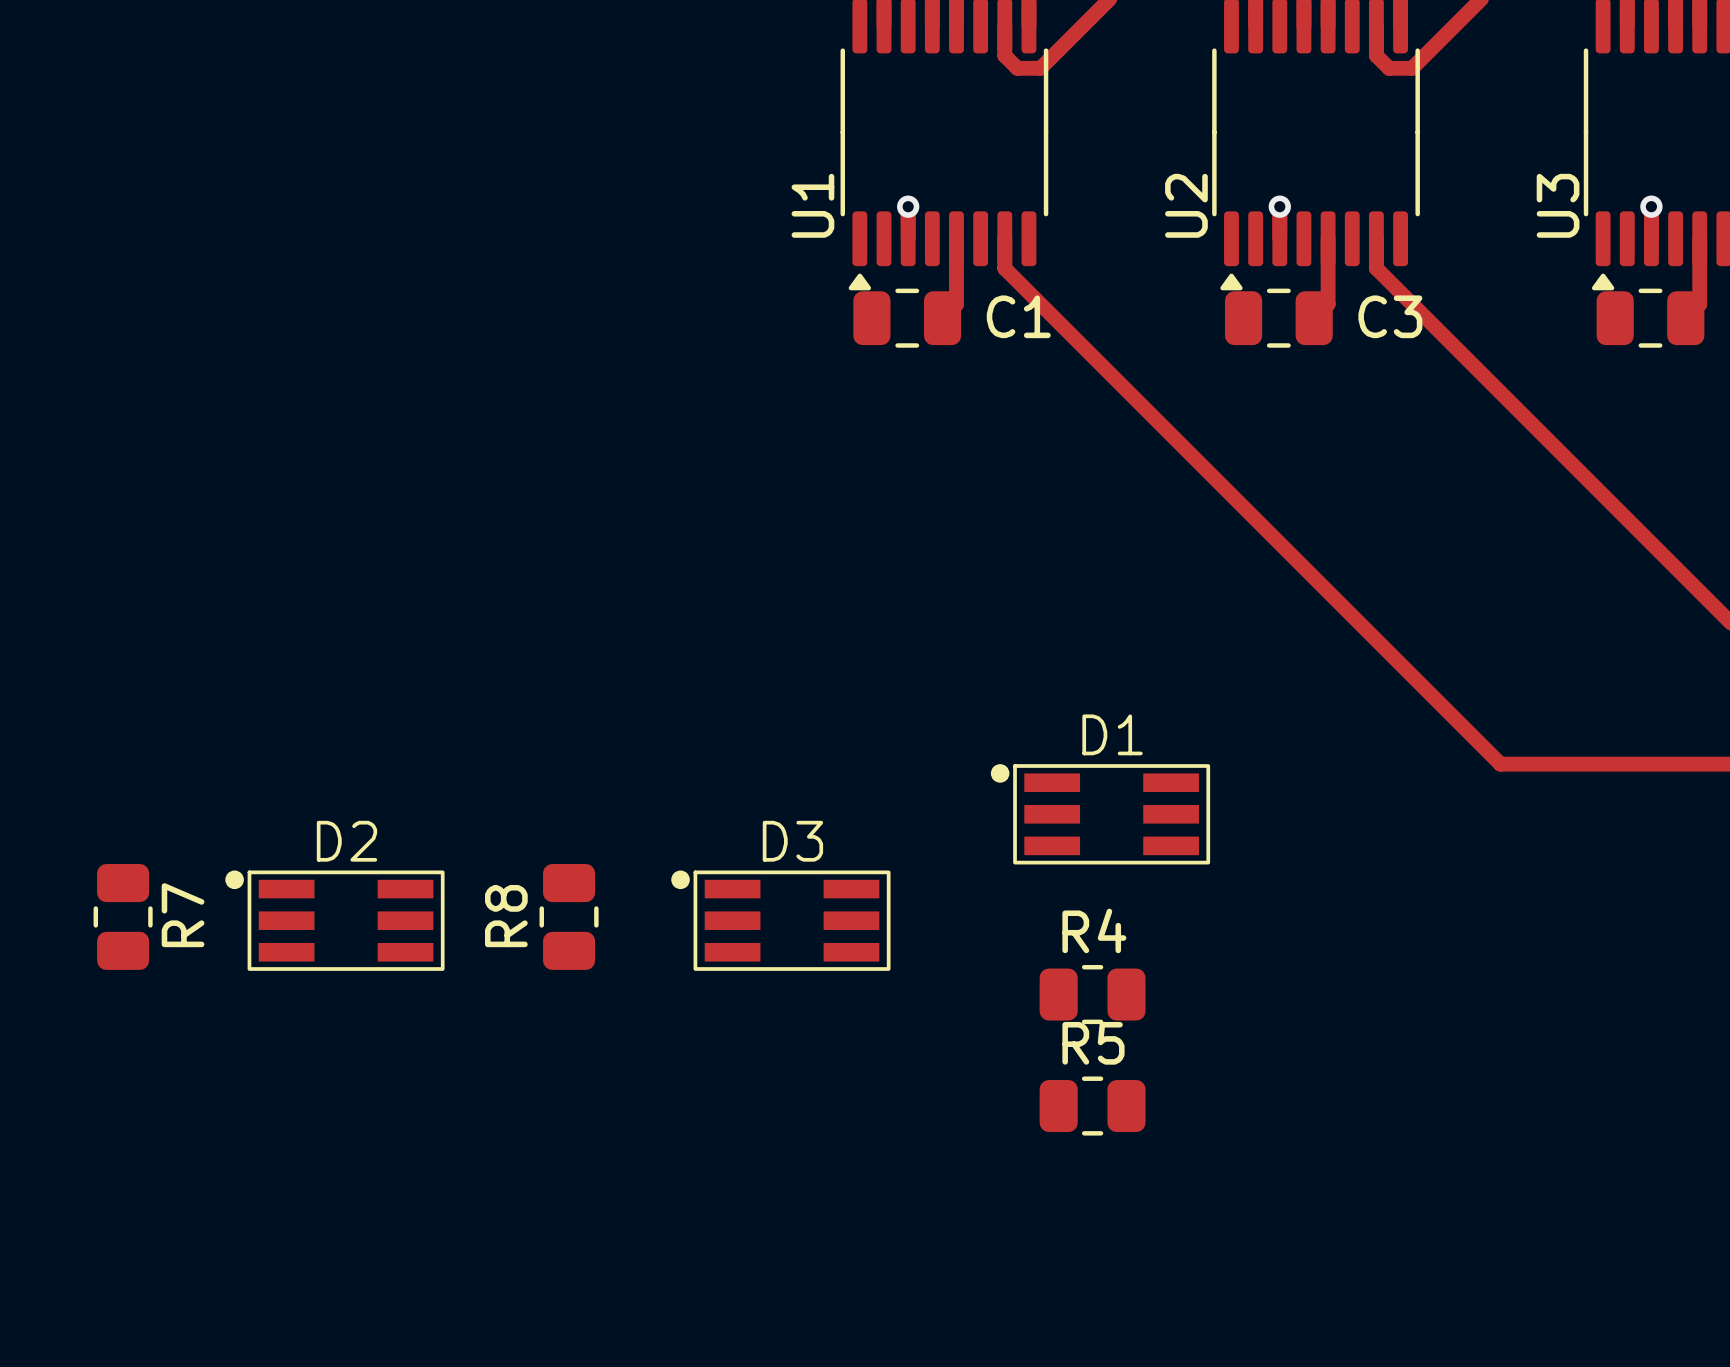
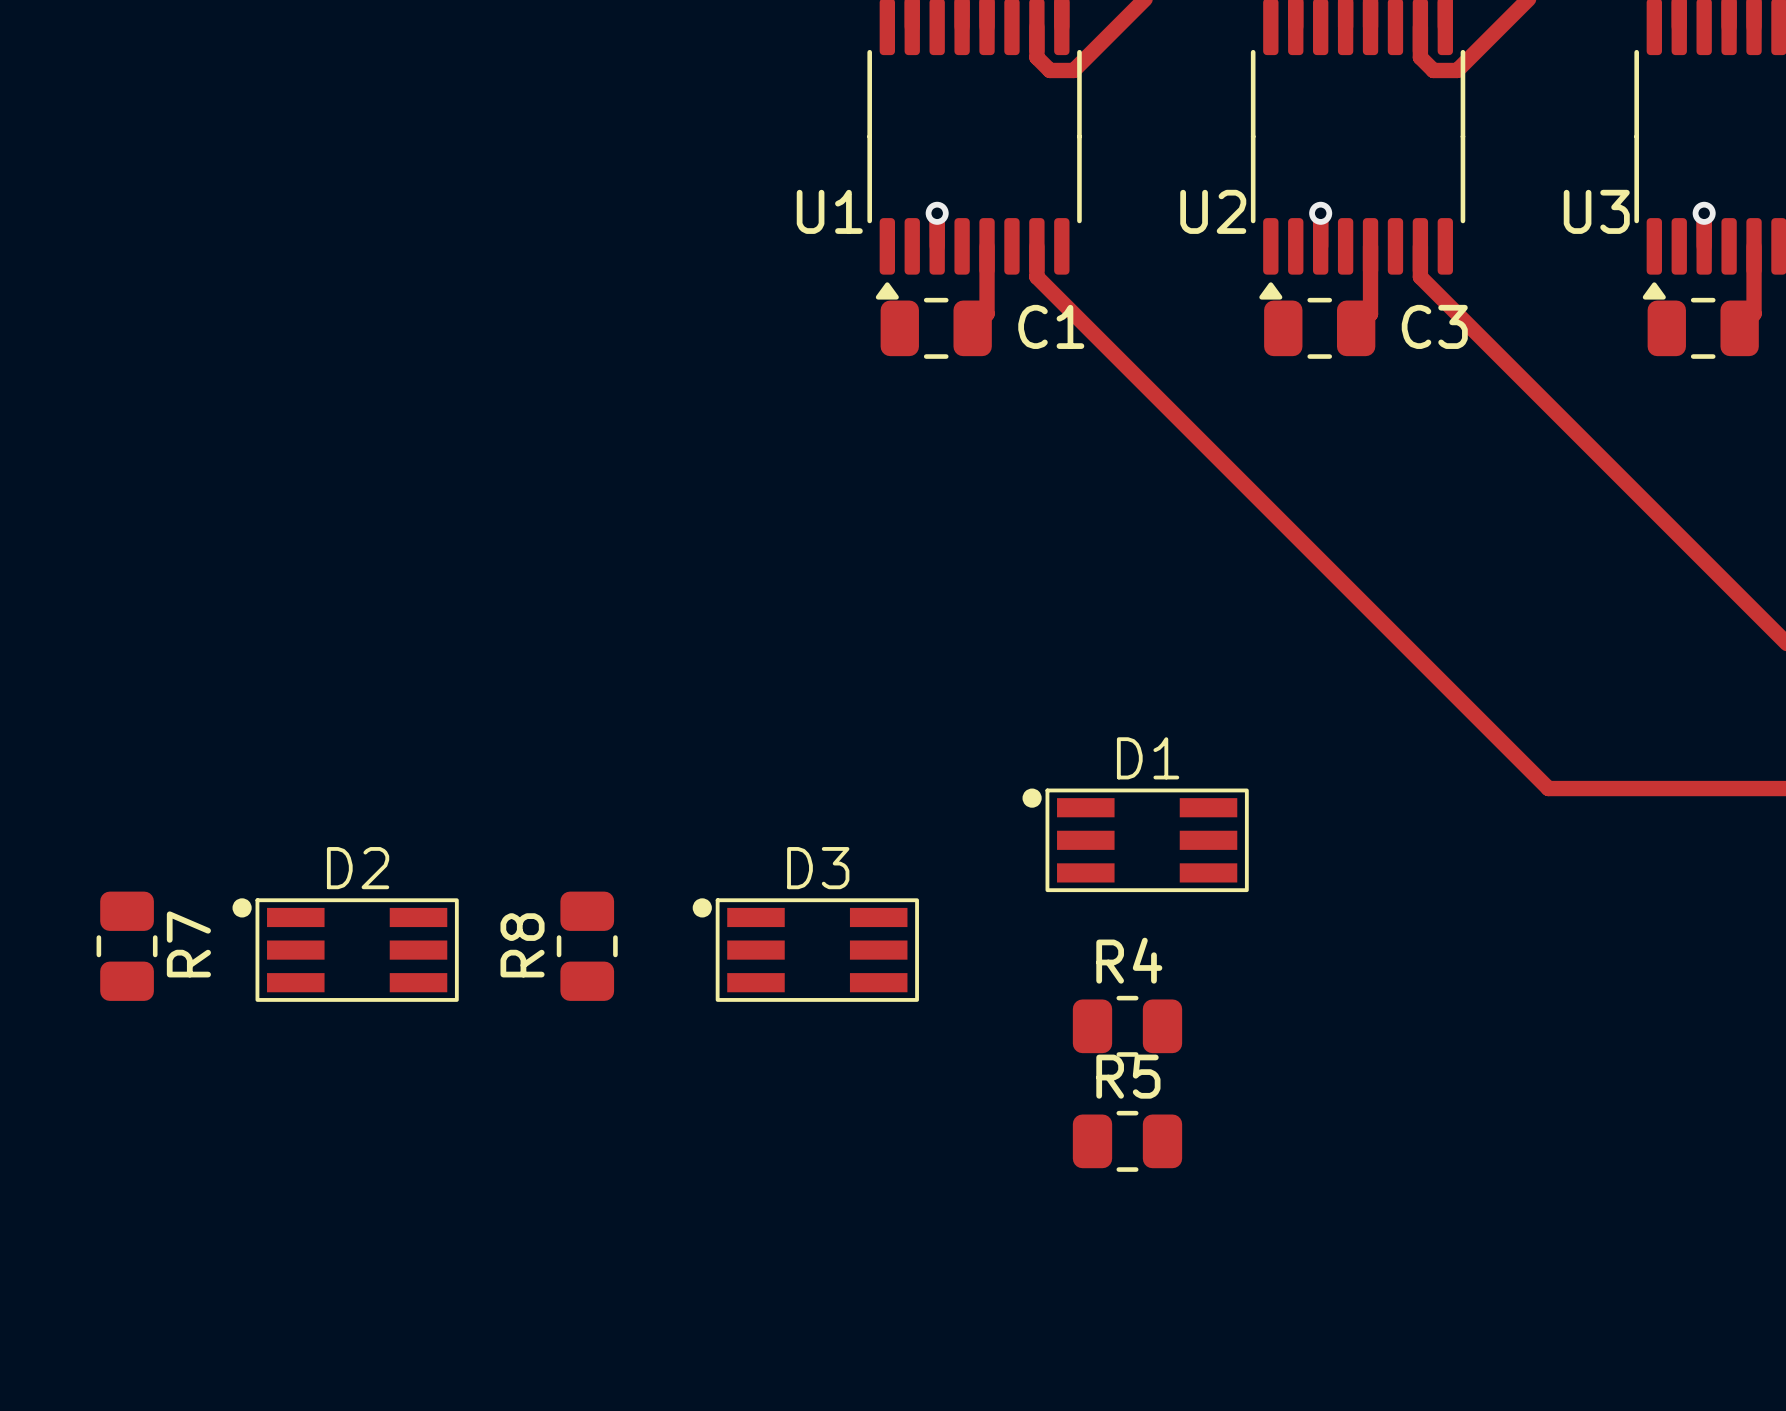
U1 name rotation: 0° (812, 205) -> 90° clockwise (829, 211)
U2 name rotation: 0° (1186, 205) -> 90° clockwise (1213, 211)
U3 name rotation: 0° (1558, 205) -> 90° clockwise (1596, 211)

